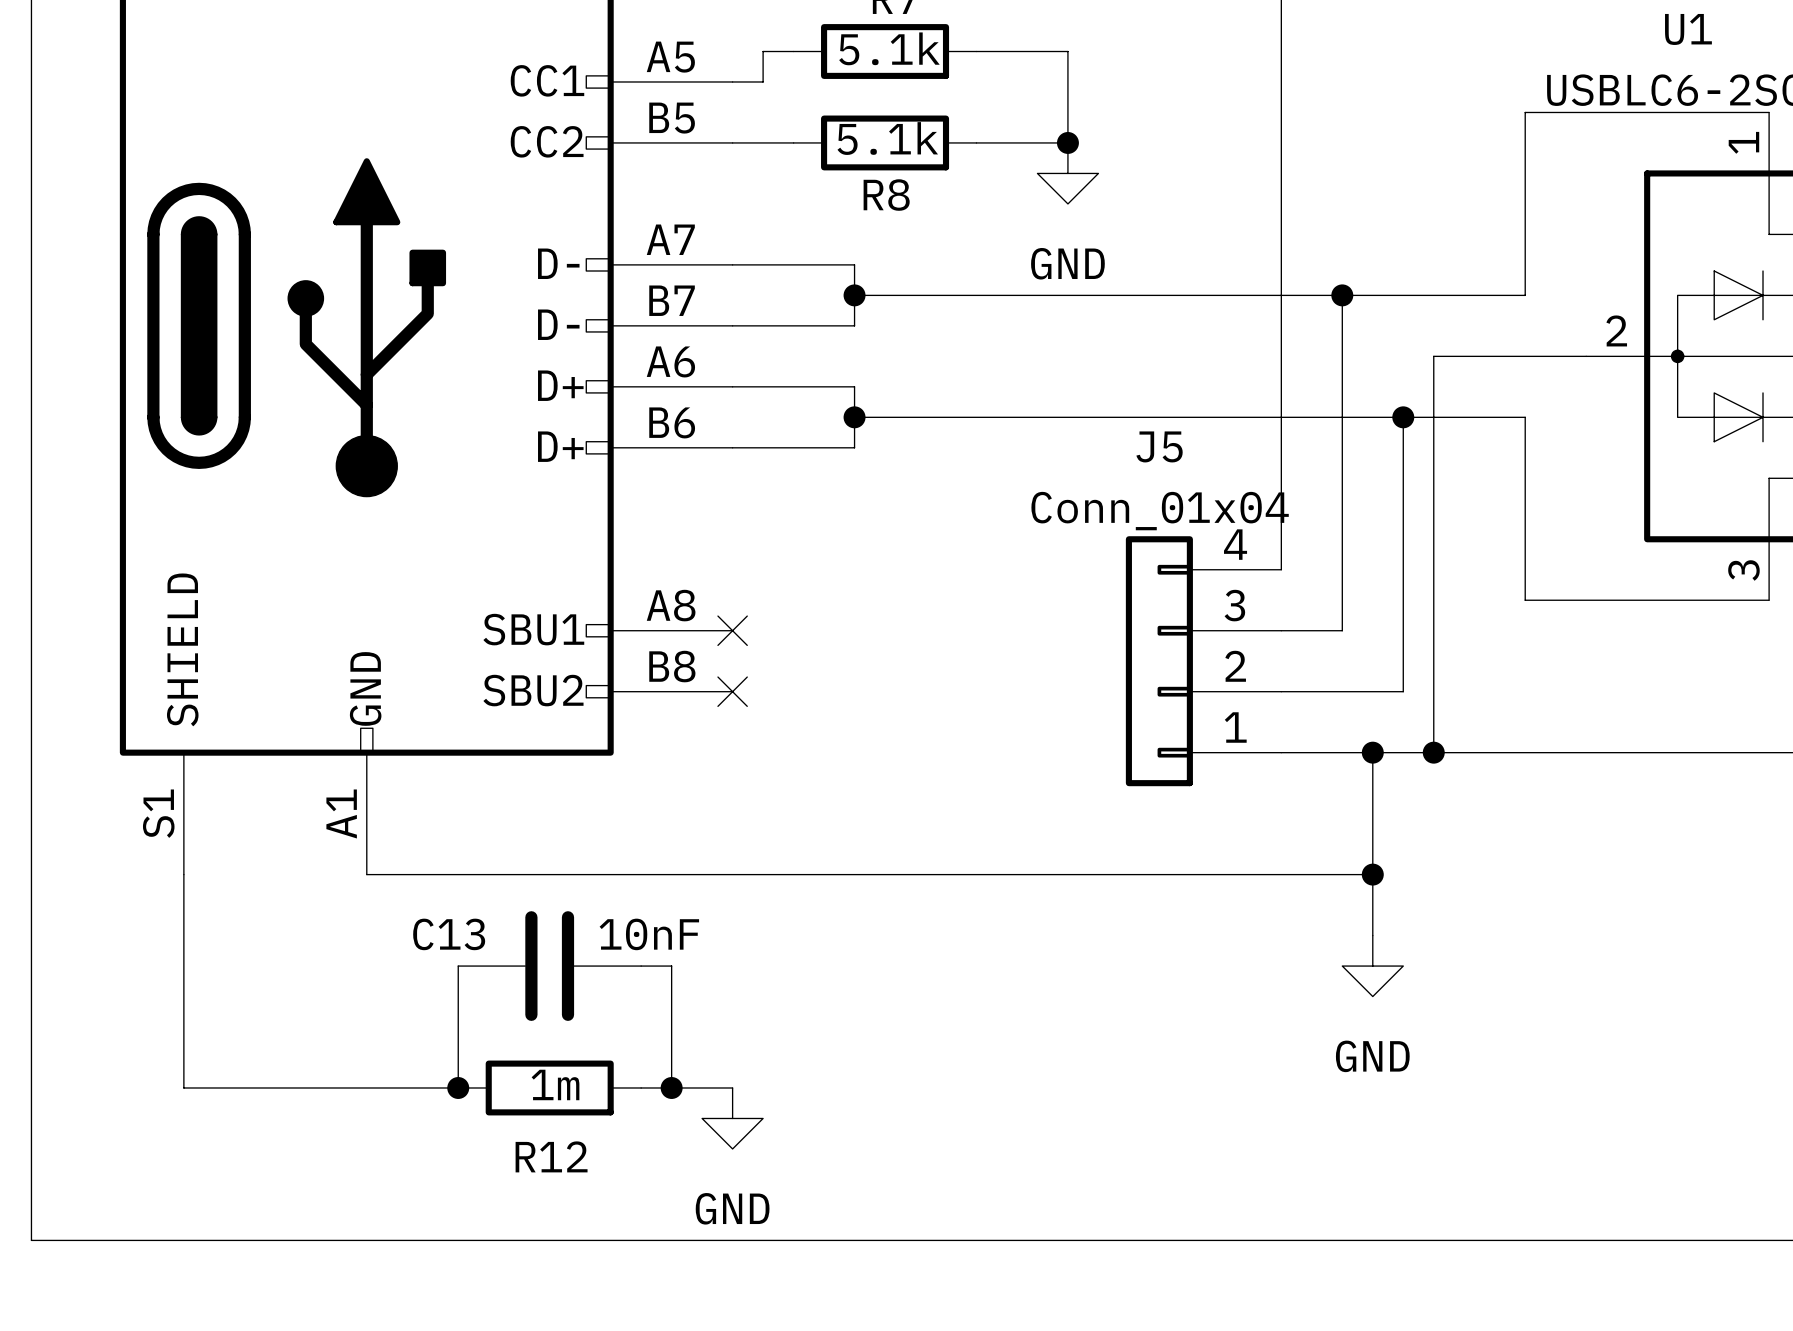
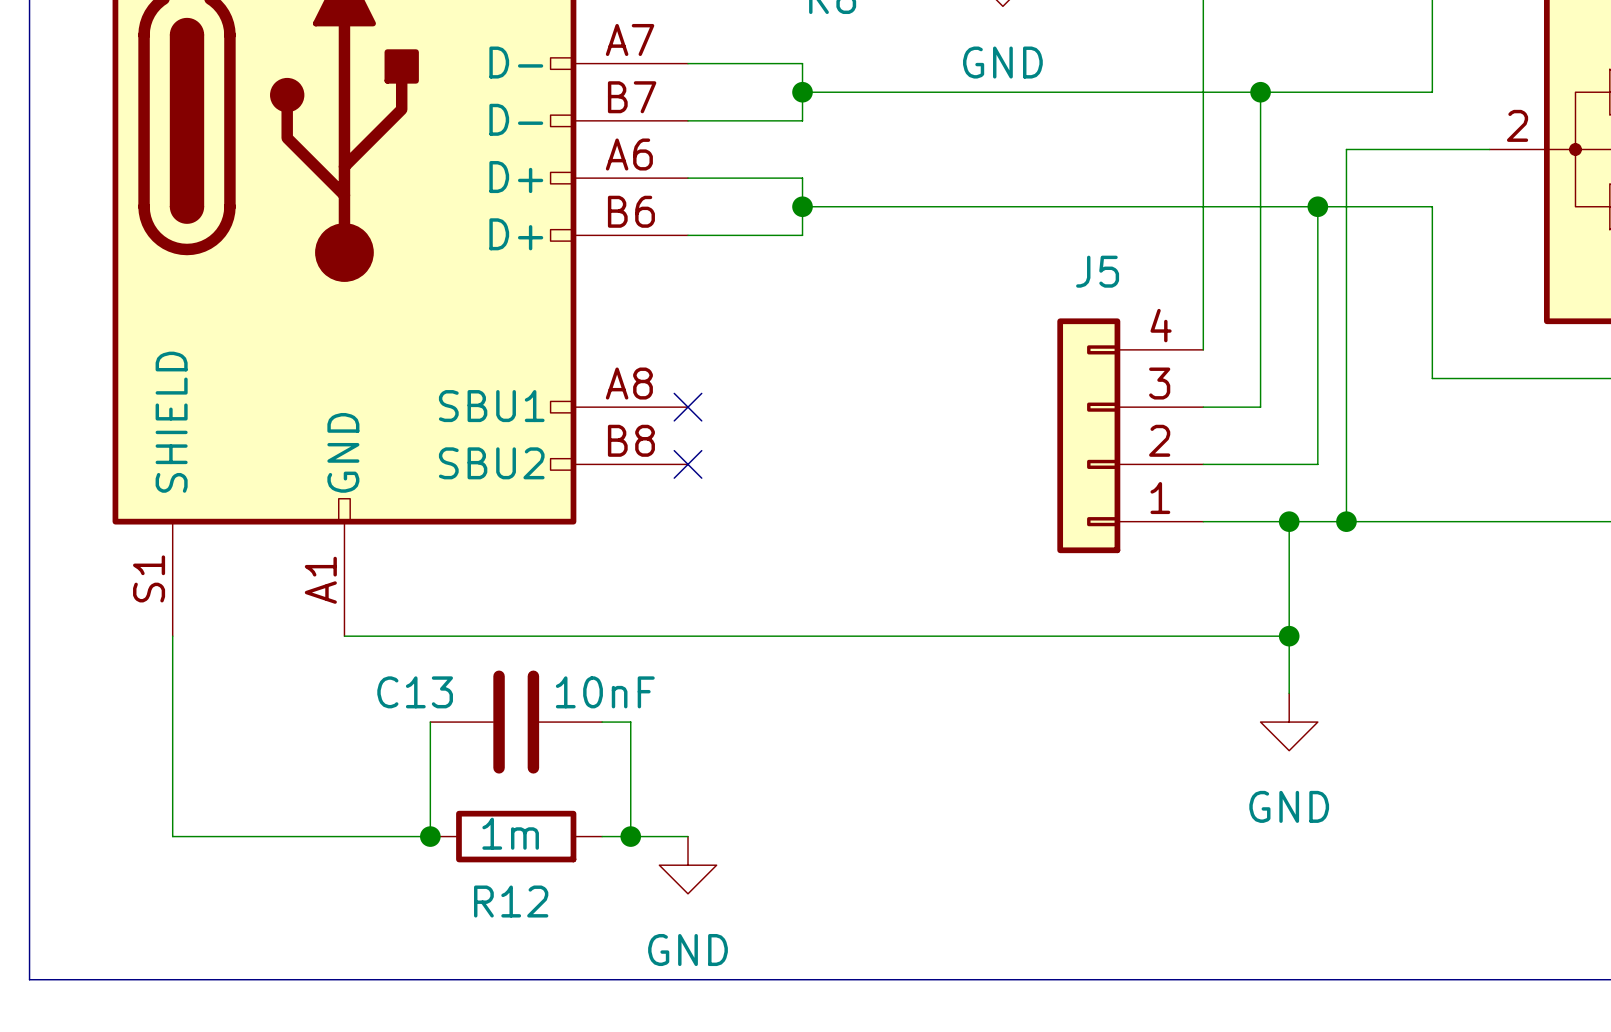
J5 name position: J5 (1159, 446) -> J5 (1097, 271)
J5 value: Conn_01x04 (1160, 511) -> none

